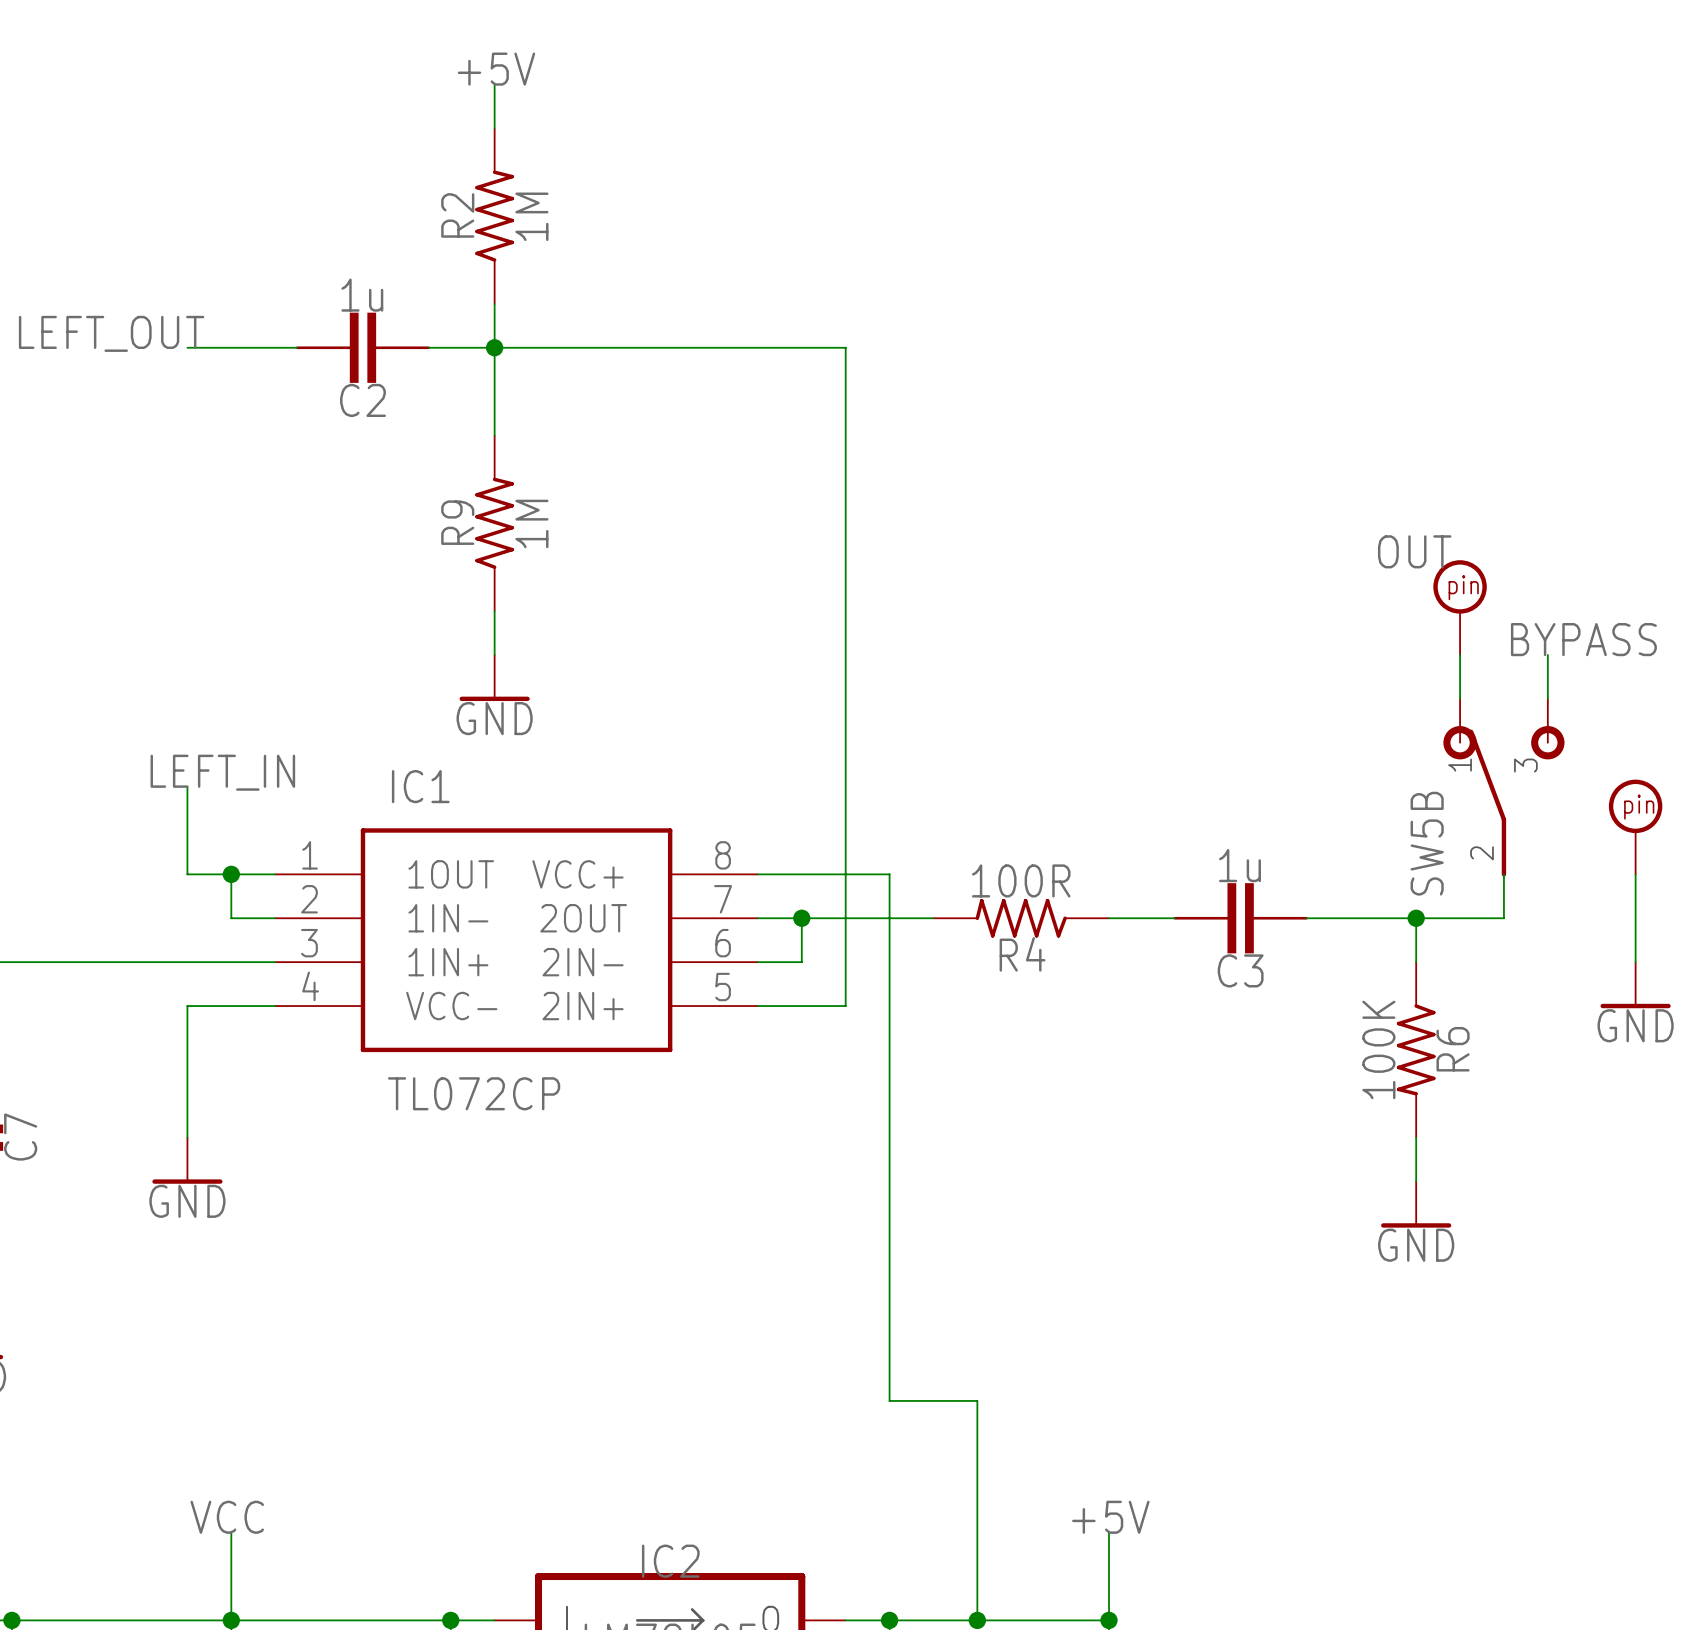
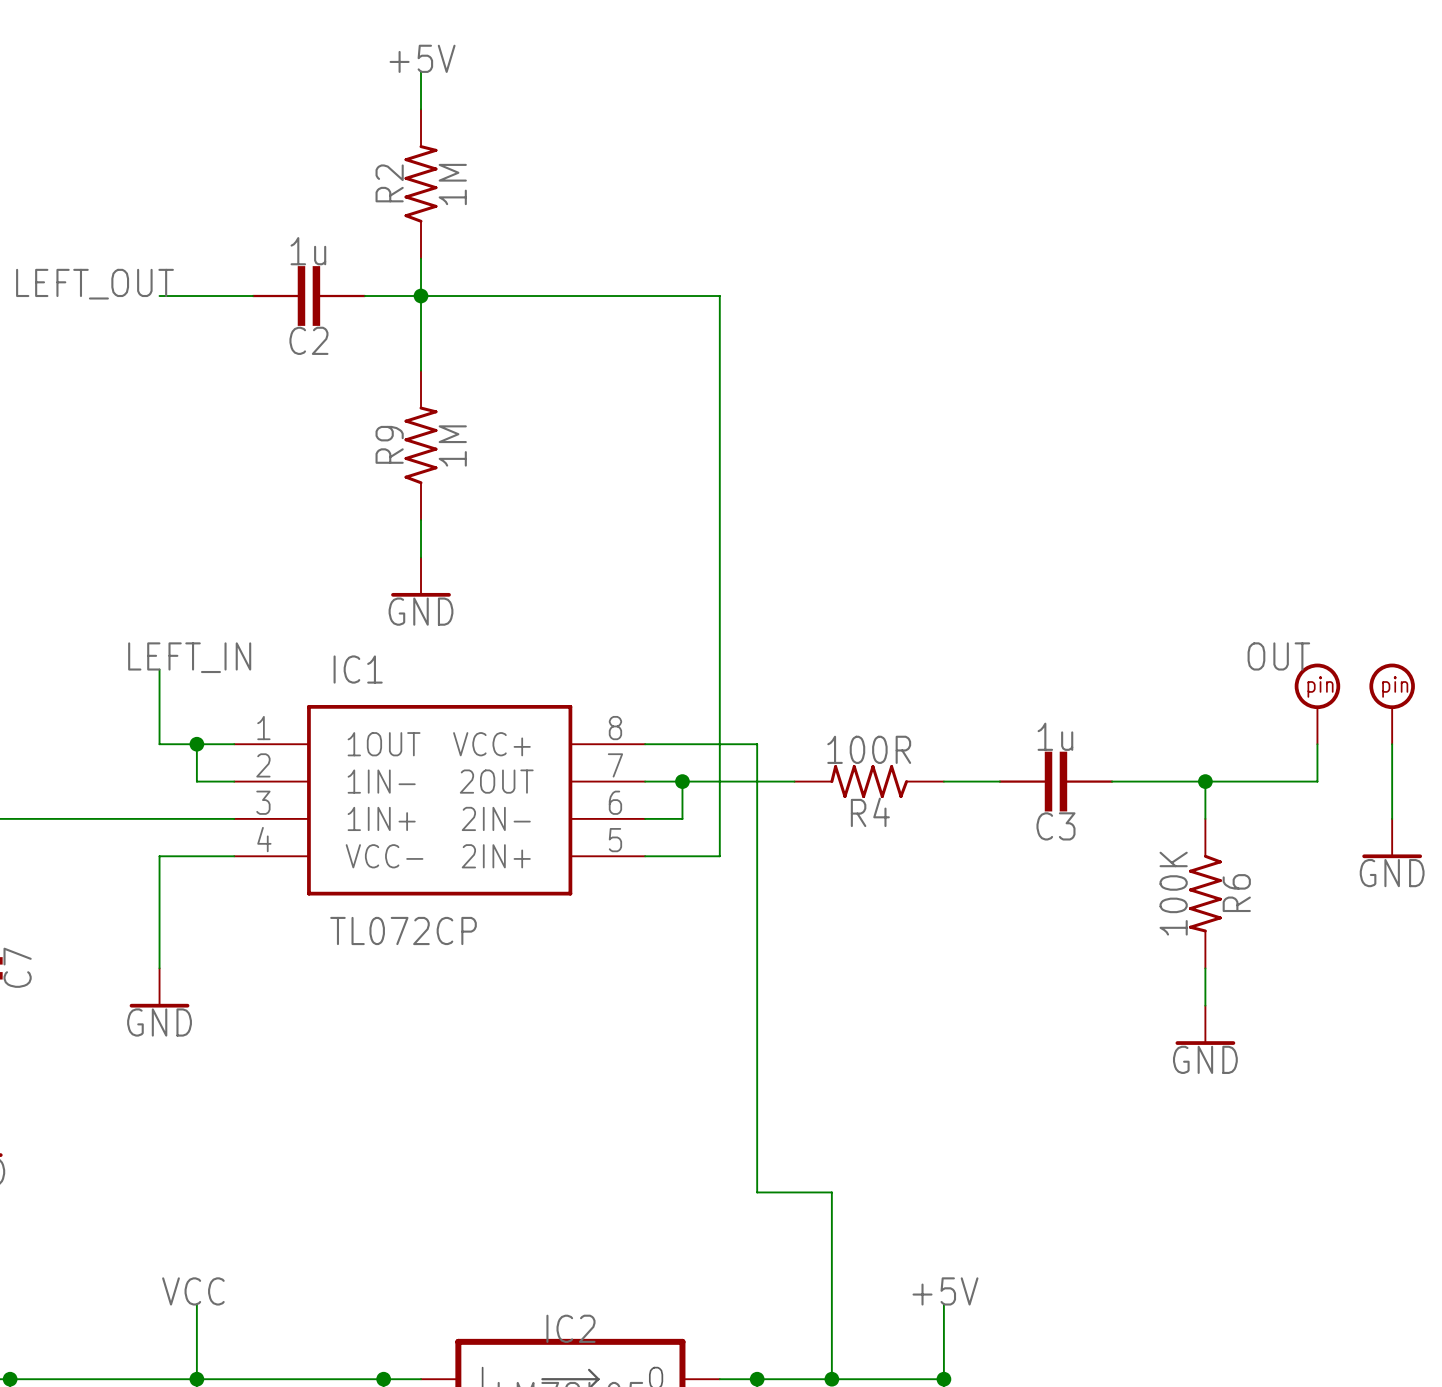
part position: (1460, 607) -> (1317, 703)
label: BYPASS (1583, 639) -> none
wire: (1460, 654) (1460, 698) -> none
wire: (1547, 654) (1547, 698) -> none
SW5B: (1503, 787) -> none
wire: (1503, 874) (1503, 918) -> (1317, 744) (1317, 781) (1280, 781)

